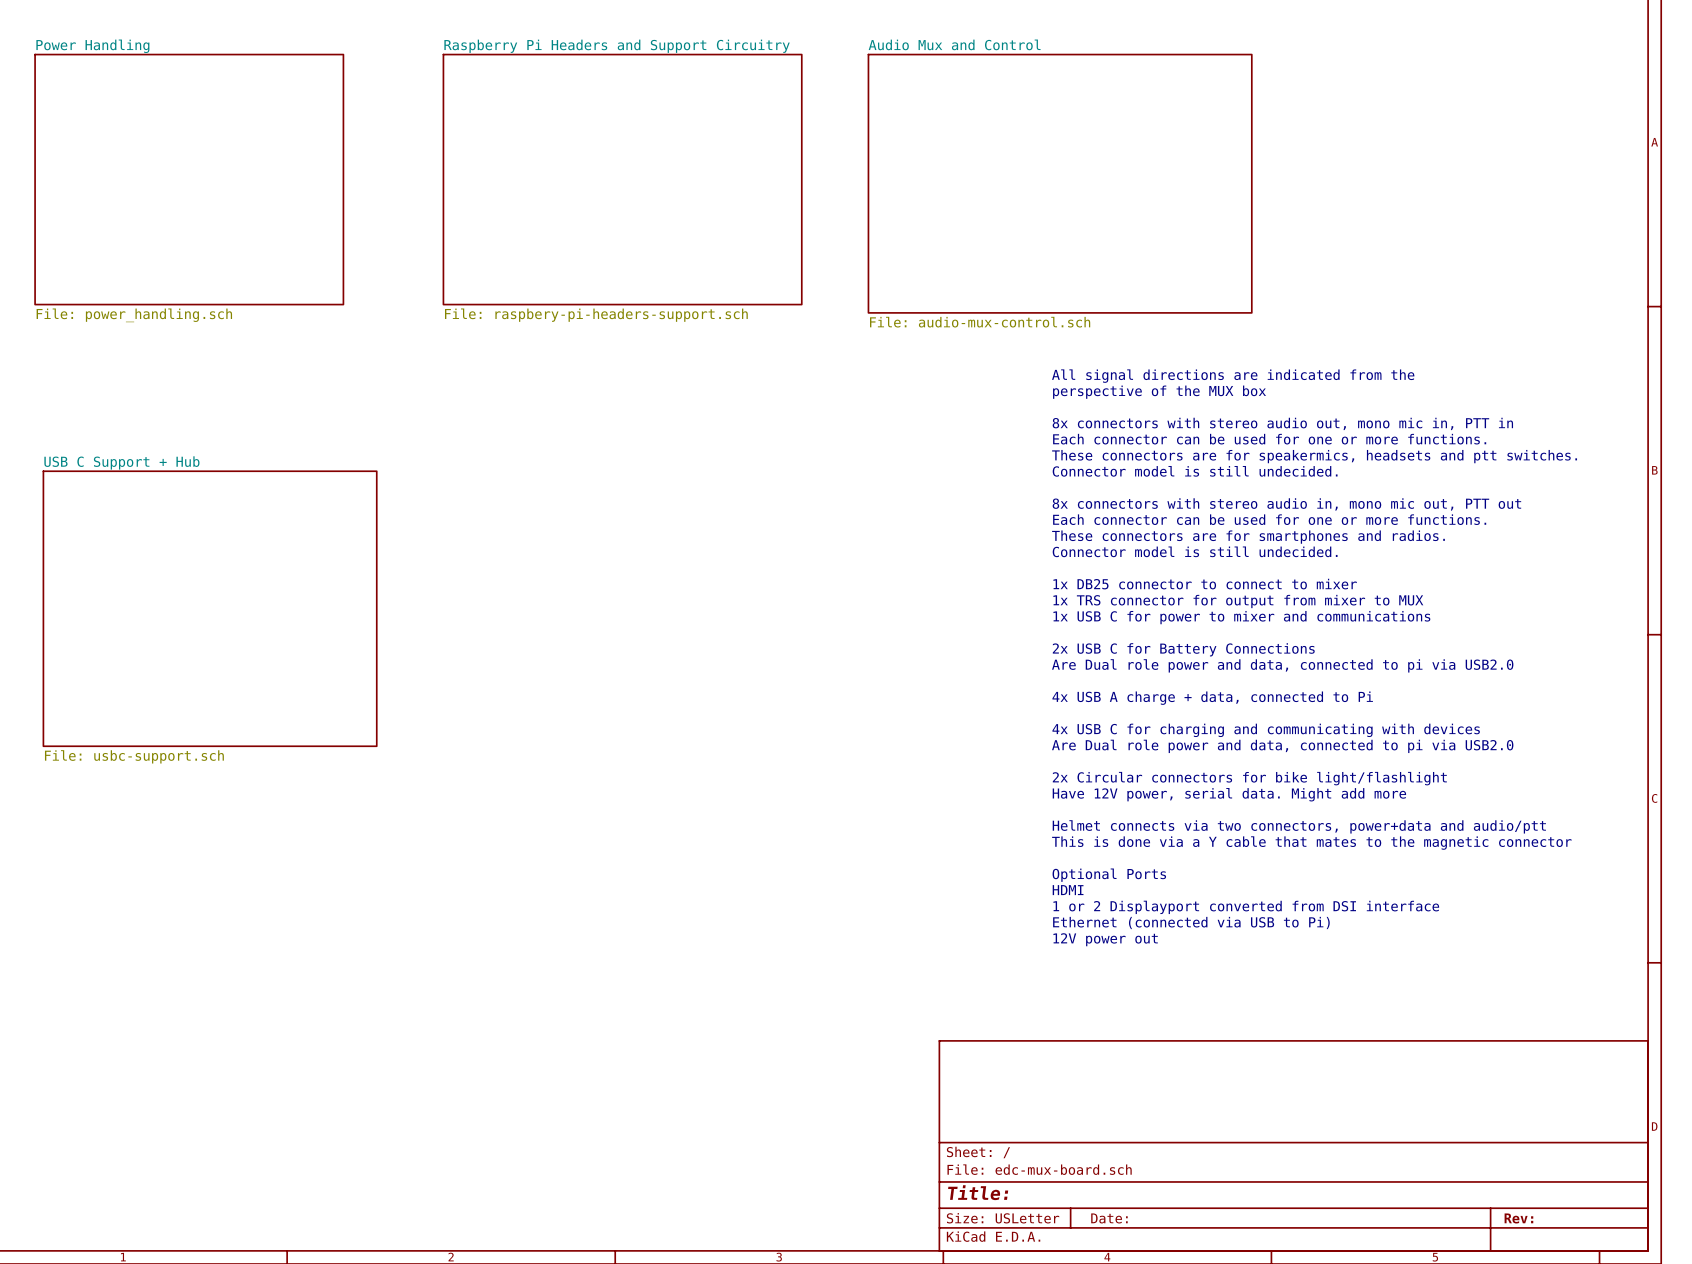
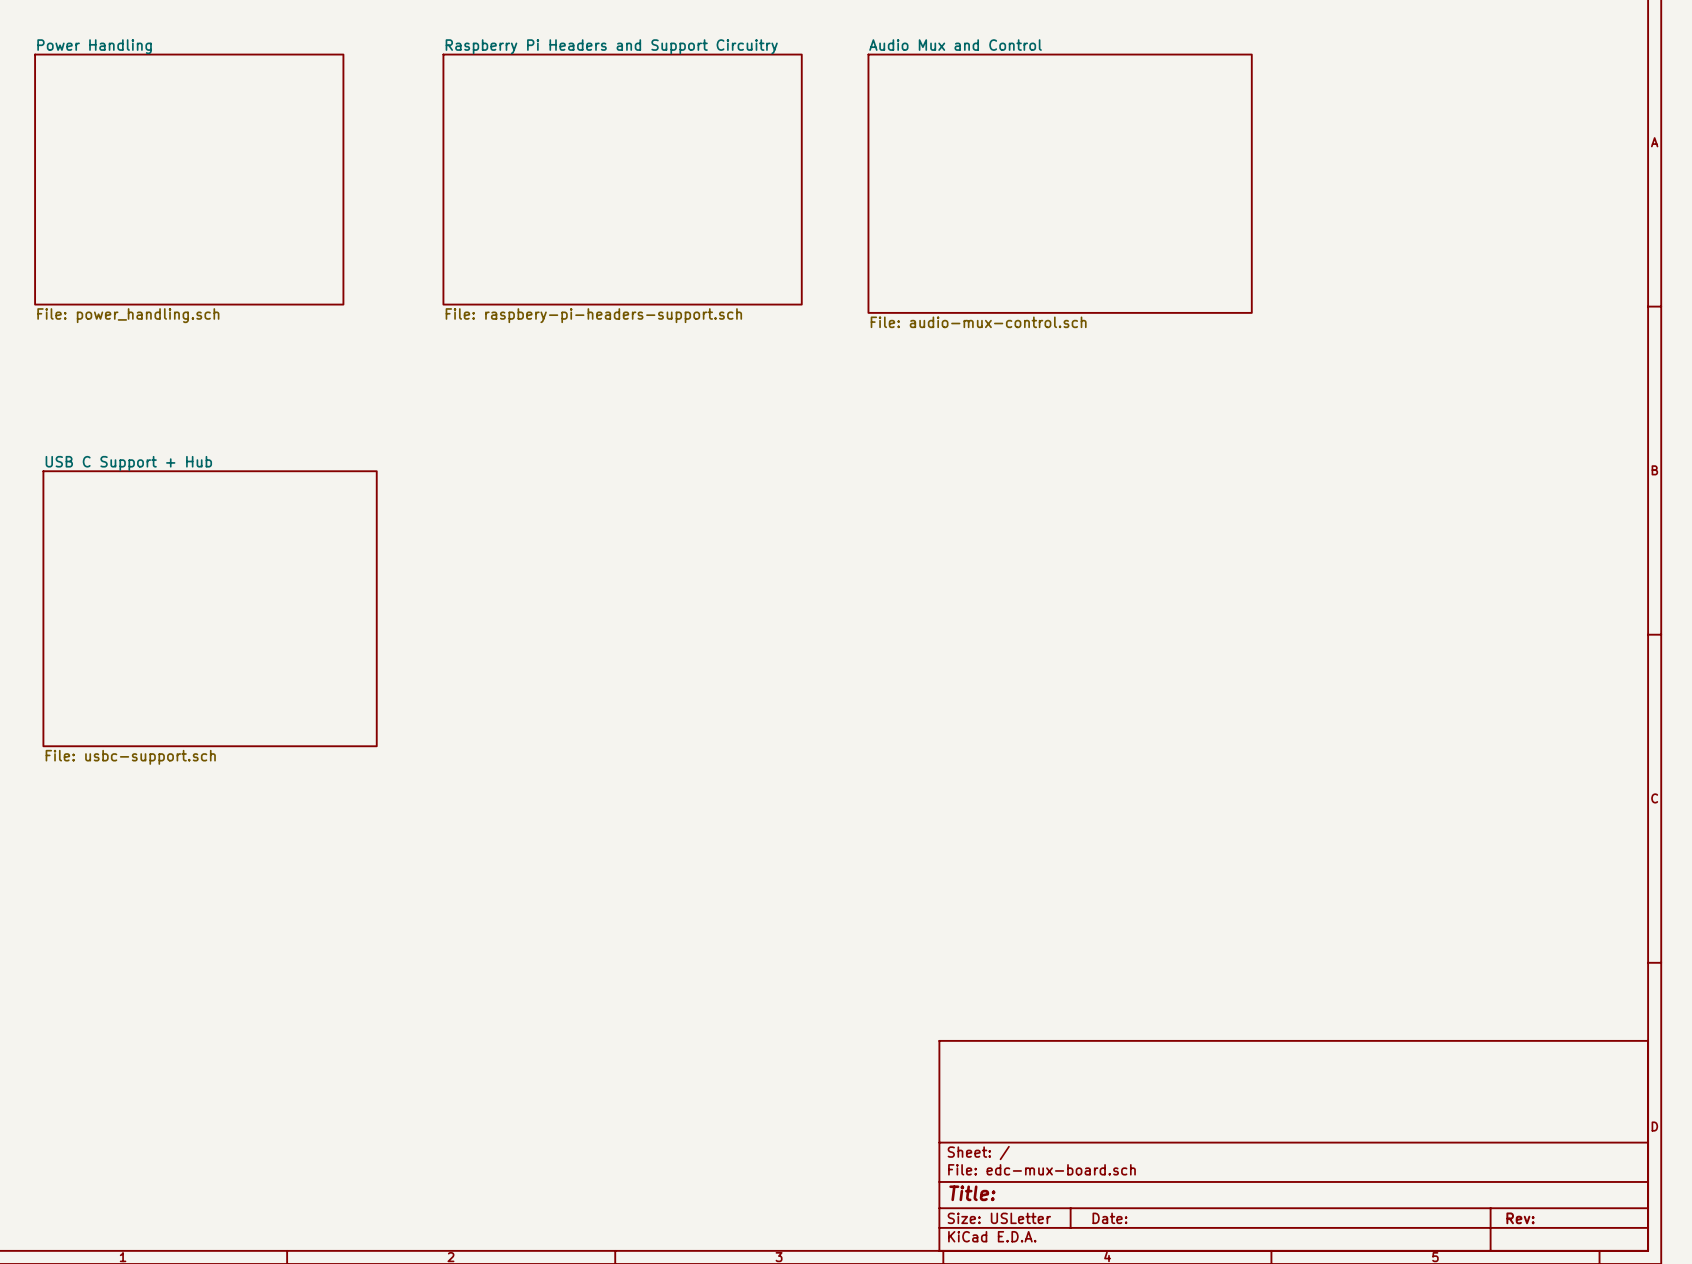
text: All signal directions are indicated from the (1233, 376) -> none
text: perspective of the MUX box (1159, 392) -> none
text: 8x connectors with stereo audio out, mono mic in, PTT in (1282, 423) -> none
text: Each connector can be used for one or more functions. (1269, 439) -> none
text: These connectors are for speakermics, headsets and ptt switches. (1314, 456) -> none
text: Connector model is still undecided. (1195, 471) -> none
text: 8x connectors with stereo audio in, mono mic out, PTT out (1286, 504) -> none
text: Each connector can be used for one or more functions. (1269, 519) -> none
text: These connectors are for smartphones and radios. (1248, 537) -> none
text: Connector model is still undecided. (1195, 551) -> none
text: 1x DB25 connector to connect to mixer (1205, 584) -> none
text: 1x TRS connector for output from mixer to MUX (1238, 601) -> none
text: 1x USB C for power to mixer and communications (1241, 617) -> none
text: 2x USB C for Battery Connections (1183, 649) -> none
text: Are Dual role power and data, connected to pi via USB2.0 (1282, 665) -> none
text: 4x USB A charge + data, connected to Pi (1212, 698) -> none
text: 4x USB C for charging and communicating with devices (1266, 730) -> none
text: Are Dual role power and data, connected to pi via USB2.0 (1282, 746) -> none
text: 2x Circular connectors for bike light/flashlight (1249, 778) -> none
text: Have 12V power, serial data. Might add more (1229, 794) -> none
text: Helmet connects via two connectors, power+data and audio/ptt (1299, 826) -> none
text: This is done via a Y cable that mates to the magnetic connector (1311, 843) -> none
text: Optional Ports (1109, 875) -> none
text: HDMI (1068, 890) -> none
text: 1 or 2 Displayport converted from DSI interface (1246, 907) -> none
text: Ethernet (connected via USB to Pi) (1191, 923) -> none
text: 12V power out (1105, 939) -> none

